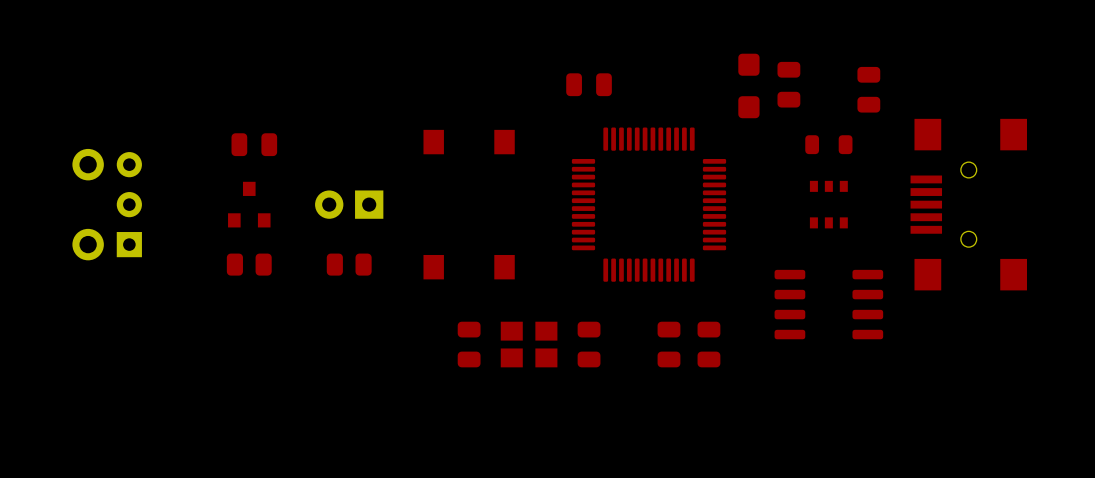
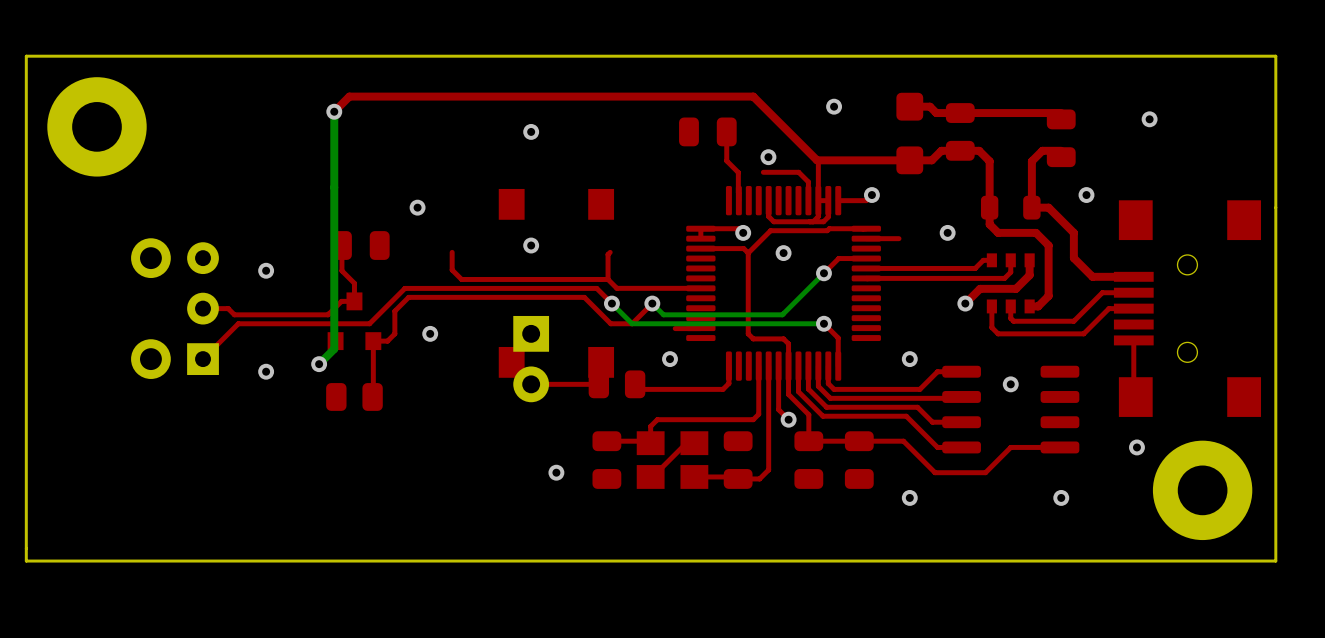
board edge: none -> (1275, 56) (1275, 561) (26, 561) (26, 56) (1275, 56)
via: none -> (834, 106)
top track: none -> (909, 106) (929, 106) (936, 113) (1061, 113)
top track: none -> (334, 111) (349, 96) (753, 96) (817, 160)
bottom track: none -> (334, 111) (334, 349) (319, 364)
via: none -> (334, 111)
via: none -> (1149, 119)
part: none -> (96, 126)
via: none -> (531, 131)
top track: none -> (726, 131) (726, 160) (738, 172) (738, 200)
top track: none -> (1061, 150) (1042, 150) (1031, 161) (1031, 207) (1048, 207) (1073, 232) (1073, 258) (1092, 276) (1133, 276)
via: none -> (768, 157)
top track: none -> (817, 160) (931, 160) (941, 150) (979, 150) (989, 161) (989, 224) (998, 232) (1036, 232) (1048, 245) (1048, 296) (1038, 306) (1029, 306)
top track: none -> (817, 160) (818, 216) (813, 221)
top track: none -> (763, 172) (798, 172) (808, 182) (808, 200)
top track: none -> (871, 195) (866, 200) (838, 200)
via: none -> (871, 195)
via: none -> (1086, 195)
top track: none -> (818, 200) (828, 200) (828, 217) (823, 221) (773, 221) (768, 216) (768, 200)
part position: (254, 144) -> (360, 245)
via: none -> (417, 207)
top track: none -> (866, 228) (770, 230) (748, 253)
top track: none -> (743, 232) (739, 228) (700, 228) (700, 238)
via: none -> (743, 232)
via: none -> (947, 232)
top track: none -> (898, 238) (866, 238)
top track: none -> (341, 245) (341, 270) (354, 283) (354, 301) (341, 301) (328, 314) (234, 314) (228, 308) (203, 308)
via: none -> (531, 245)
top track: none -> (700, 248) (743, 248) (748, 253)
top track: none -> (452, 252) (452, 270) (461, 279) (608, 279)
top track: none -> (610, 252) (608, 254) (608, 279)
top track: none -> (748, 253) (748, 333) (753, 338) (783, 338) (788, 343) (788, 394) (808, 414) (808, 441) (903, 441) (935, 472) (985, 472) (1010, 447) (1059, 447)
via: none -> (783, 253)
top track: none -> (866, 258) (838, 258) (823, 273)
top track: none -> (991, 260) (983, 260) (975, 268) (866, 268)
top track: none -> (1010, 260) (1010, 272) (1004, 278) (866, 278)
top track: none -> (1029, 260) (1029, 275) (1016, 288) (980, 288) (965, 303)
via: none -> (266, 270)
bottom track: none -> (823, 273) (782, 314) (663, 314) (652, 303)
via: none -> (823, 273)
top track: none -> (608, 279) (616, 288) (700, 288)
part position: (107, 204) -> (174, 308)
part position: (249, 204) -> (354, 321)
part rotation: 0° (349, 204) -> 90° counterclockwise (531, 359)
part position: (349, 204) -> (531, 359)
part position: (968, 204) -> (1187, 308)
top track: none -> (1133, 292) (1102, 292) (1073, 321) (1013, 321) (1010, 318) (1010, 306)
top track: none -> (611, 303) (596, 288) (404, 288) (369, 323) (238, 323) (203, 359)
bottom track: none -> (611, 303) (632, 323) (823, 323)
via: none -> (611, 303)
top track: none -> (652, 303) (632, 323) (610, 323) (584, 297) (408, 297) (394, 311) (394, 333) (387, 341) (373, 341) (372, 396)
via: none -> (652, 303)
via: none -> (965, 303)
top track: none -> (991, 306) (991, 327) (998, 333) (1083, 333) (1108, 308) (1133, 308)
top track: none -> (823, 323) (838, 338) (838, 366)
via: none -> (823, 323)
top track: none -> (700, 328) (675, 328)
via: none -> (430, 333)
top track: none -> (1133, 340) (1133, 395) (1135, 397)
part: (249, 264) -> none
part: (349, 264) -> none
via: none -> (669, 359)
via: none -> (909, 359)
via: none -> (319, 364)
top track: none -> (728, 366) (728, 383) (723, 389) (640, 389) (635, 384)
top track: none -> (758, 366) (758, 414) (753, 419) (657, 419) (650, 426) (650, 443) (648, 441) (616, 441)
top track: none -> (768, 366) (768, 469) (759, 478) (694, 476)
top track: none -> (778, 366) (778, 409) (788, 419)
top track: none -> (798, 366) (798, 391) (822, 416) (906, 416) (937, 447) (961, 447)
top track: none -> (808, 366) (808, 389) (826, 407) (917, 407) (932, 422) (961, 422)
top track: none -> (818, 366) (818, 386) (830, 398) (961, 396)
top track: none -> (828, 366) (828, 383) (834, 389) (919, 389) (937, 371) (961, 371)
via: none -> (266, 371)
top track: none -> (598, 384) (531, 384)
part: none -> (616, 384)
via: none -> (1010, 384)
part: none -> (354, 396)
via: none -> (788, 419)
top track: none -> (694, 443) (686, 443) (650, 476)
via: none -> (1136, 447)
part: (469, 344) -> none
part: none -> (606, 460)
part position: (529, 344) -> (672, 460)
part position: (589, 344) -> (738, 460)
via: none -> (556, 472)
part: none -> (1202, 490)
via: none -> (909, 497)
via: none -> (1061, 497)

